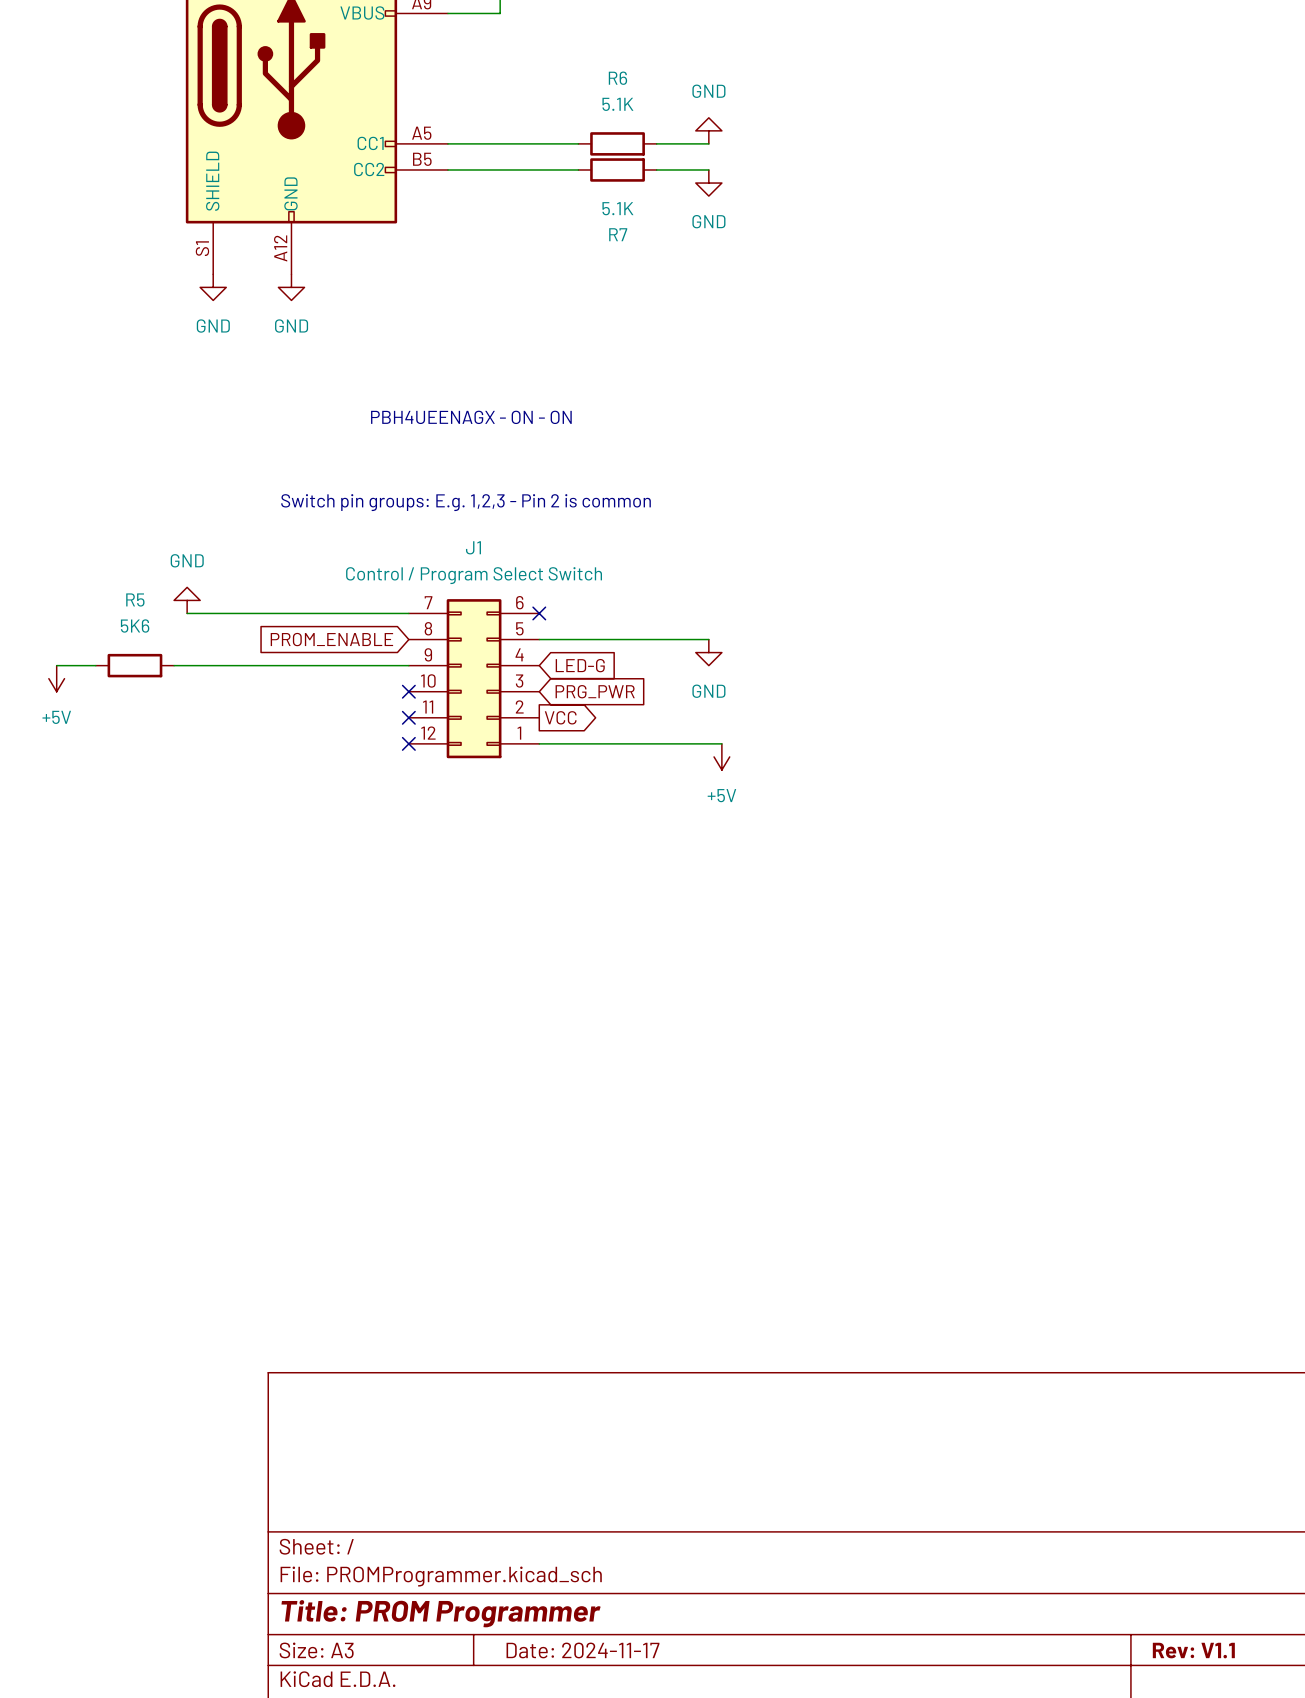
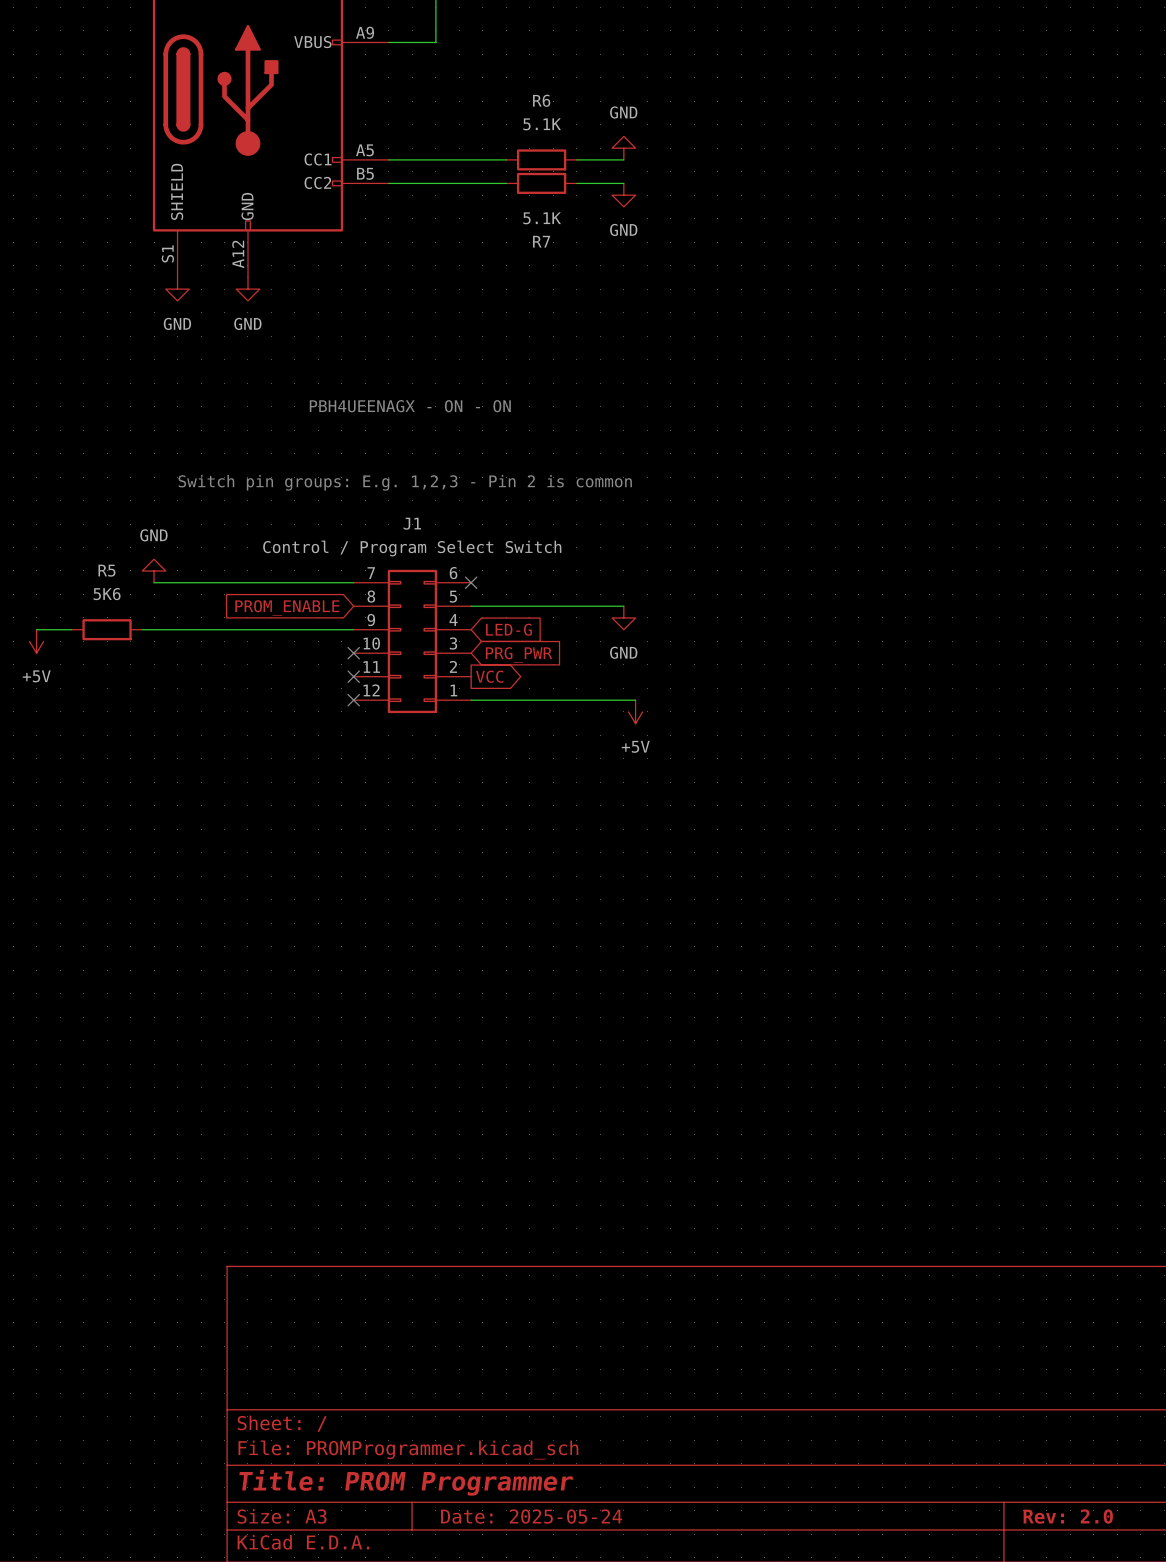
title block: Date: 2024-11-17 (582, 1650) -> Date: 2025-05-24 (531, 1516)
title block: Rev: V1.1 (1193, 1650) -> Rev: 2.0 (1068, 1516)

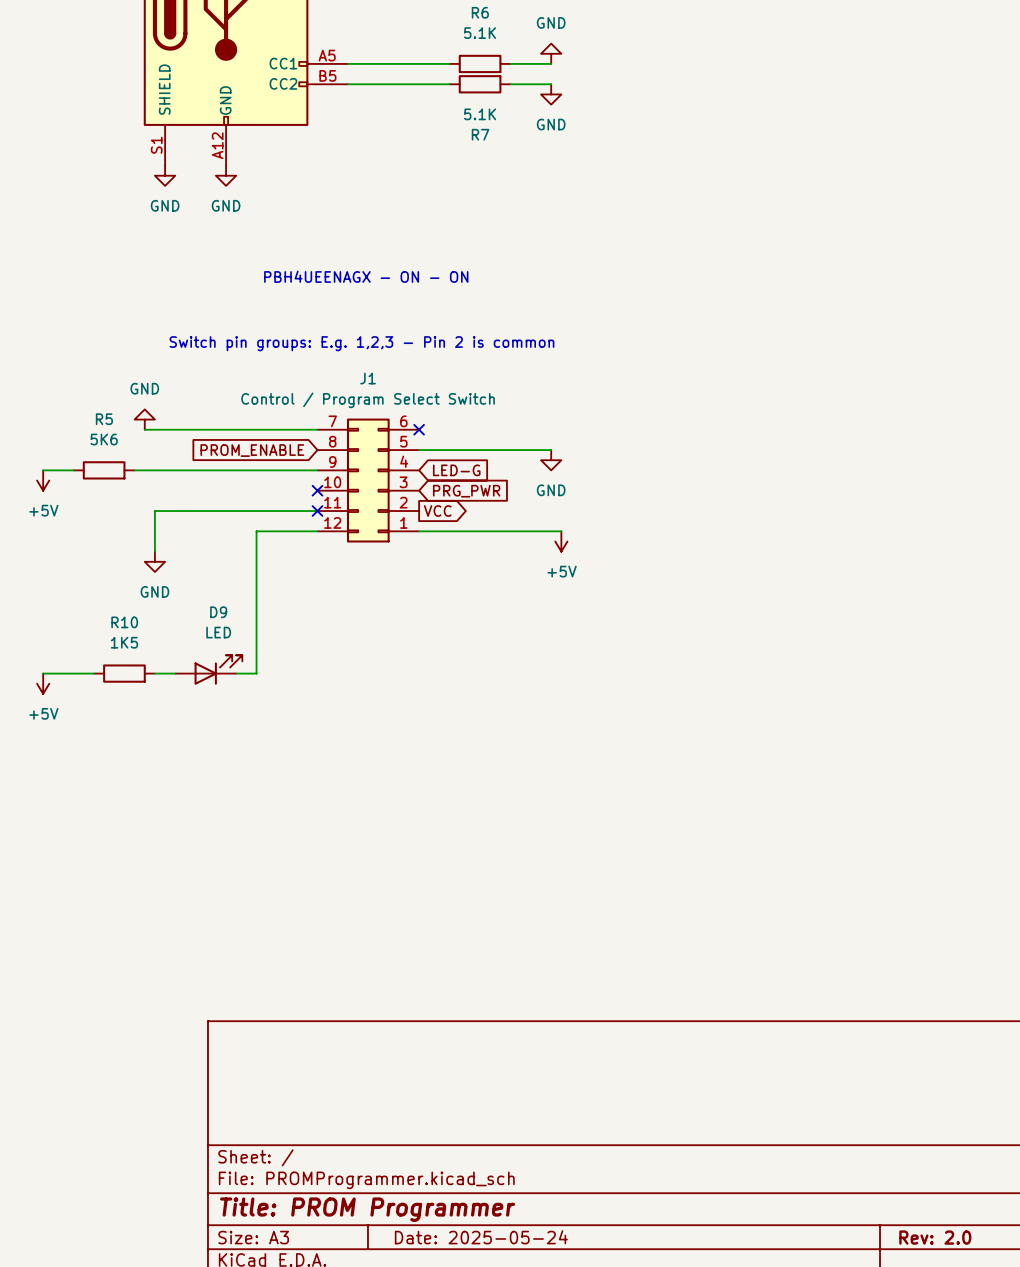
wire: none -> (317, 511) (154, 511) (154, 551)
wire: none -> (317, 531) (256, 531) (256, 673) (236, 673)
no-connect mark: (353, 700) -> none
power symbol: none -> GND (154, 561)
D9: none -> LED (208, 670)
wire: none -> (43, 673) (93, 673)
R10: none -> 1K5 (124, 673)
wire: none -> (154, 673) (175, 673)
power symbol: none -> +5V (43, 683)

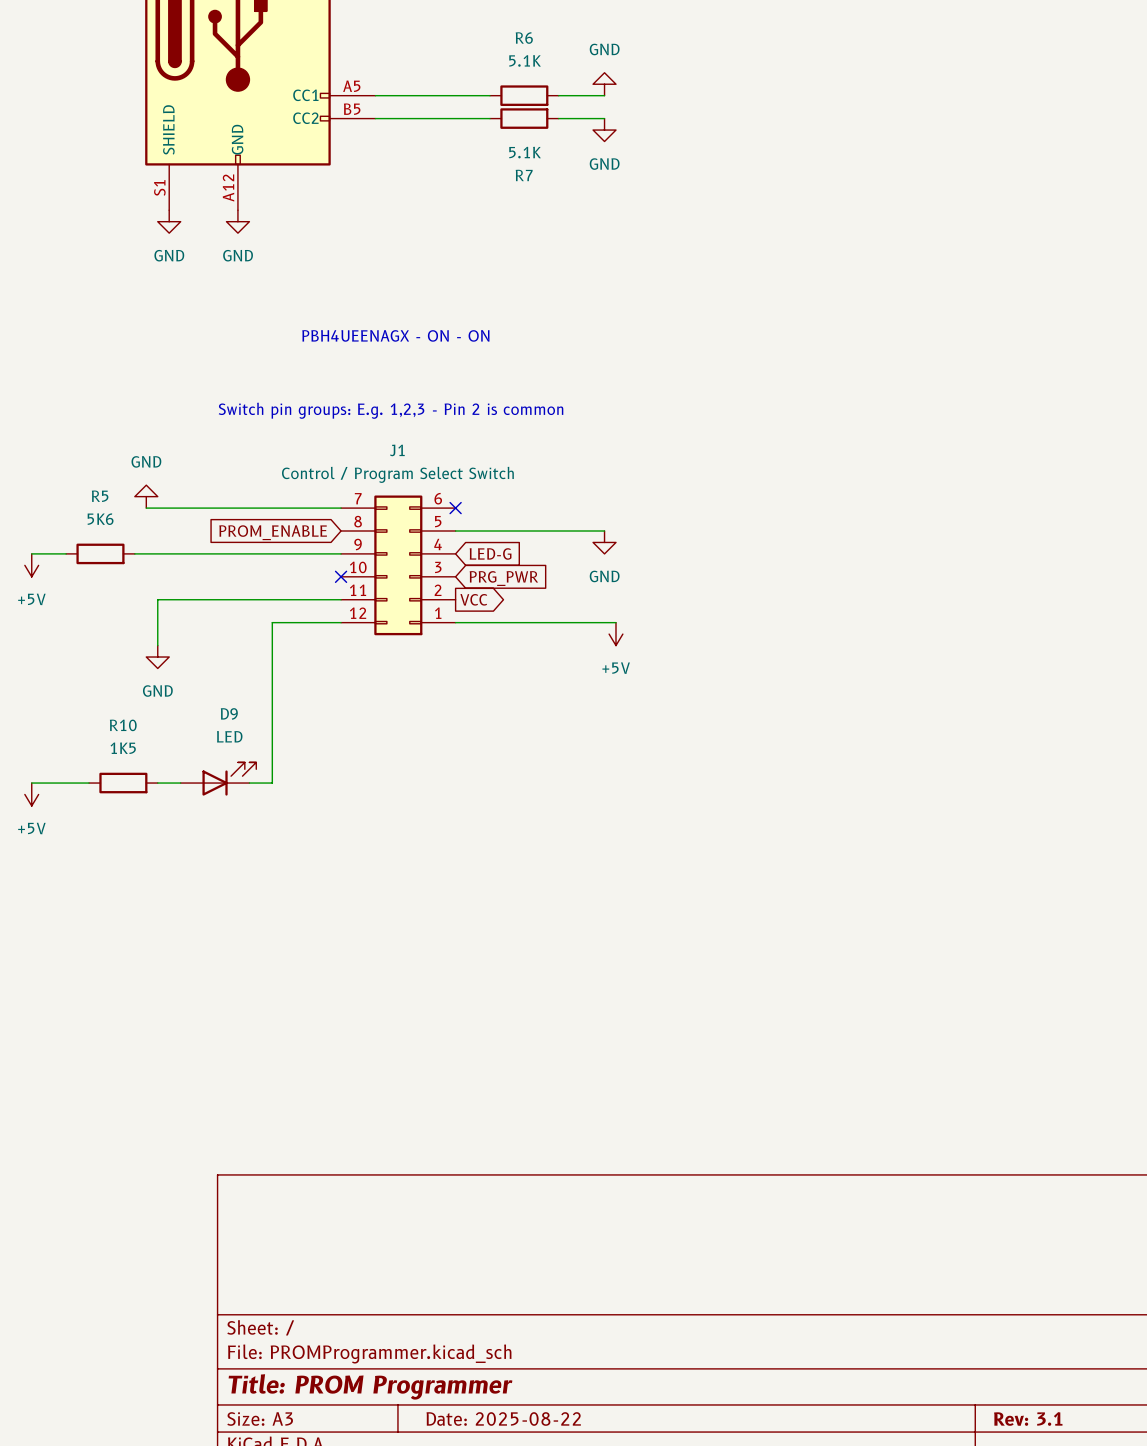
no-connect mark: (317, 511) -> none
title block: Date: 2025-05-24 (481, 1237) -> Date: 2025-08-22 (503, 1418)
title block: Rev: 2.0 (935, 1237) -> Rev: 3.1 (1028, 1419)

